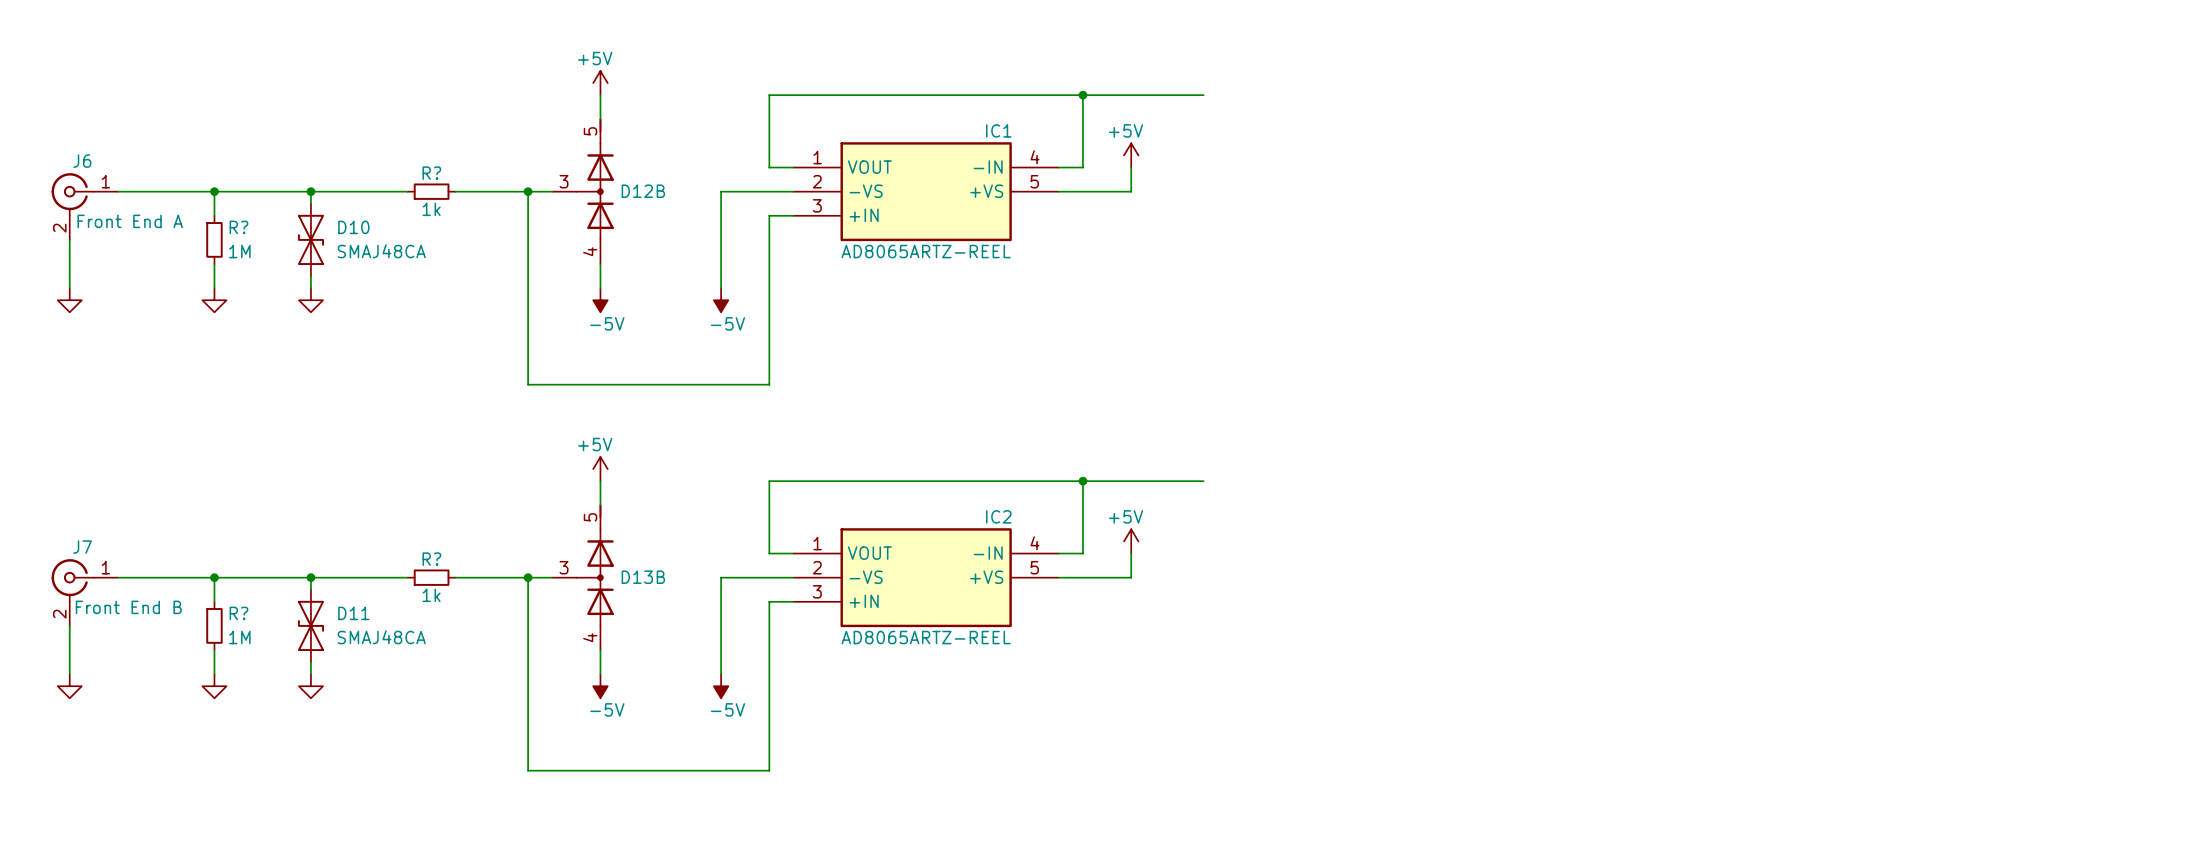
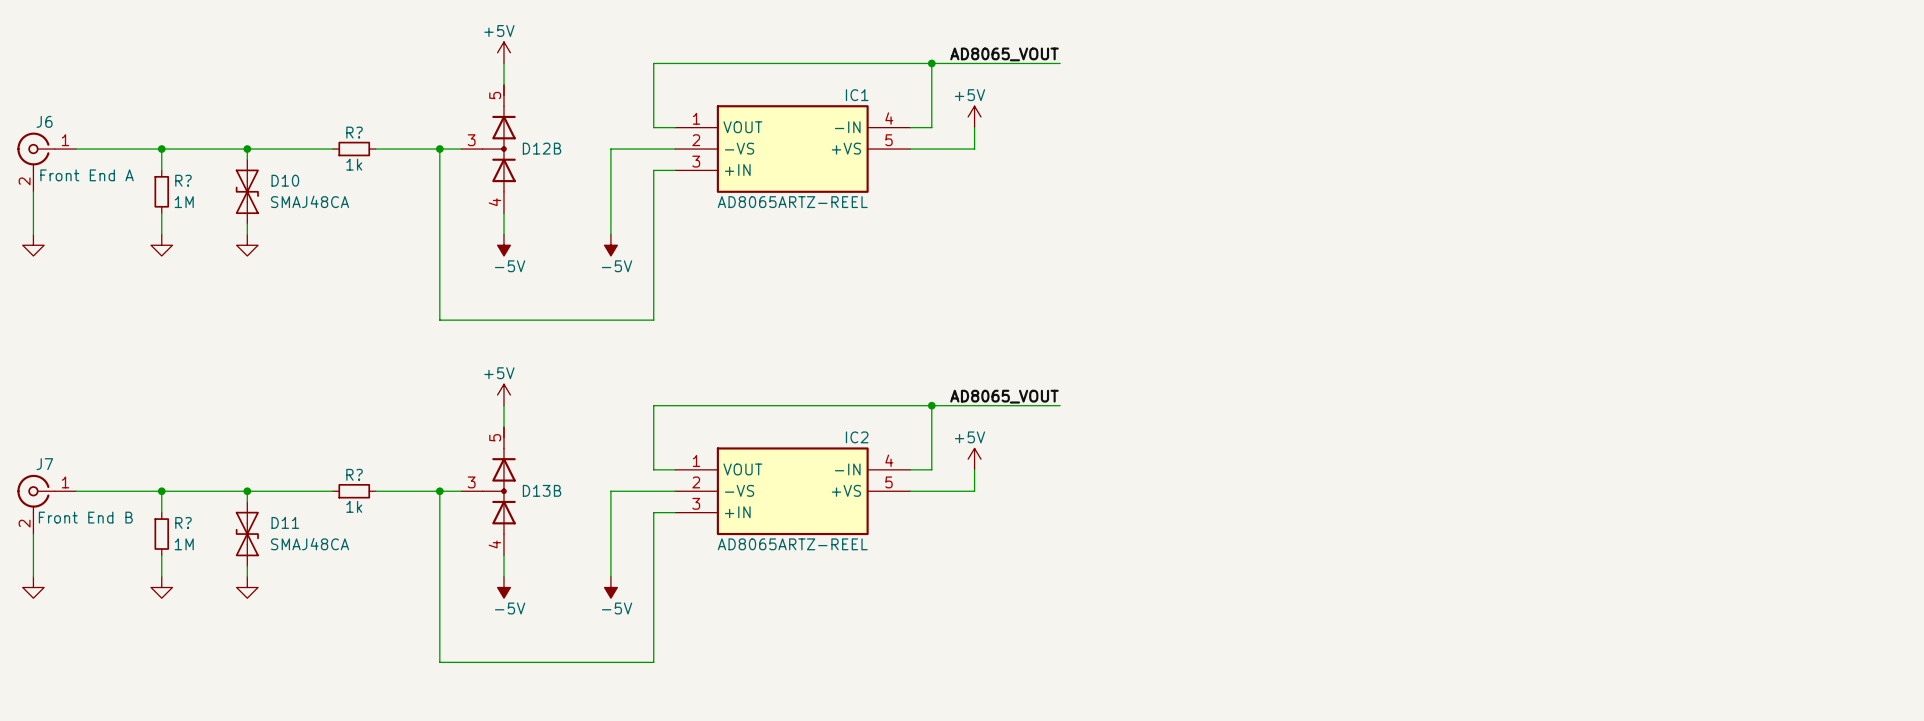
label: none -> AD8065_VOUT (1004, 54)
wire: none -> (1038, 63) (1060, 63)
label: none -> AD8065_VOUT (1004, 396)
wire: none -> (1038, 405) (1060, 405)

